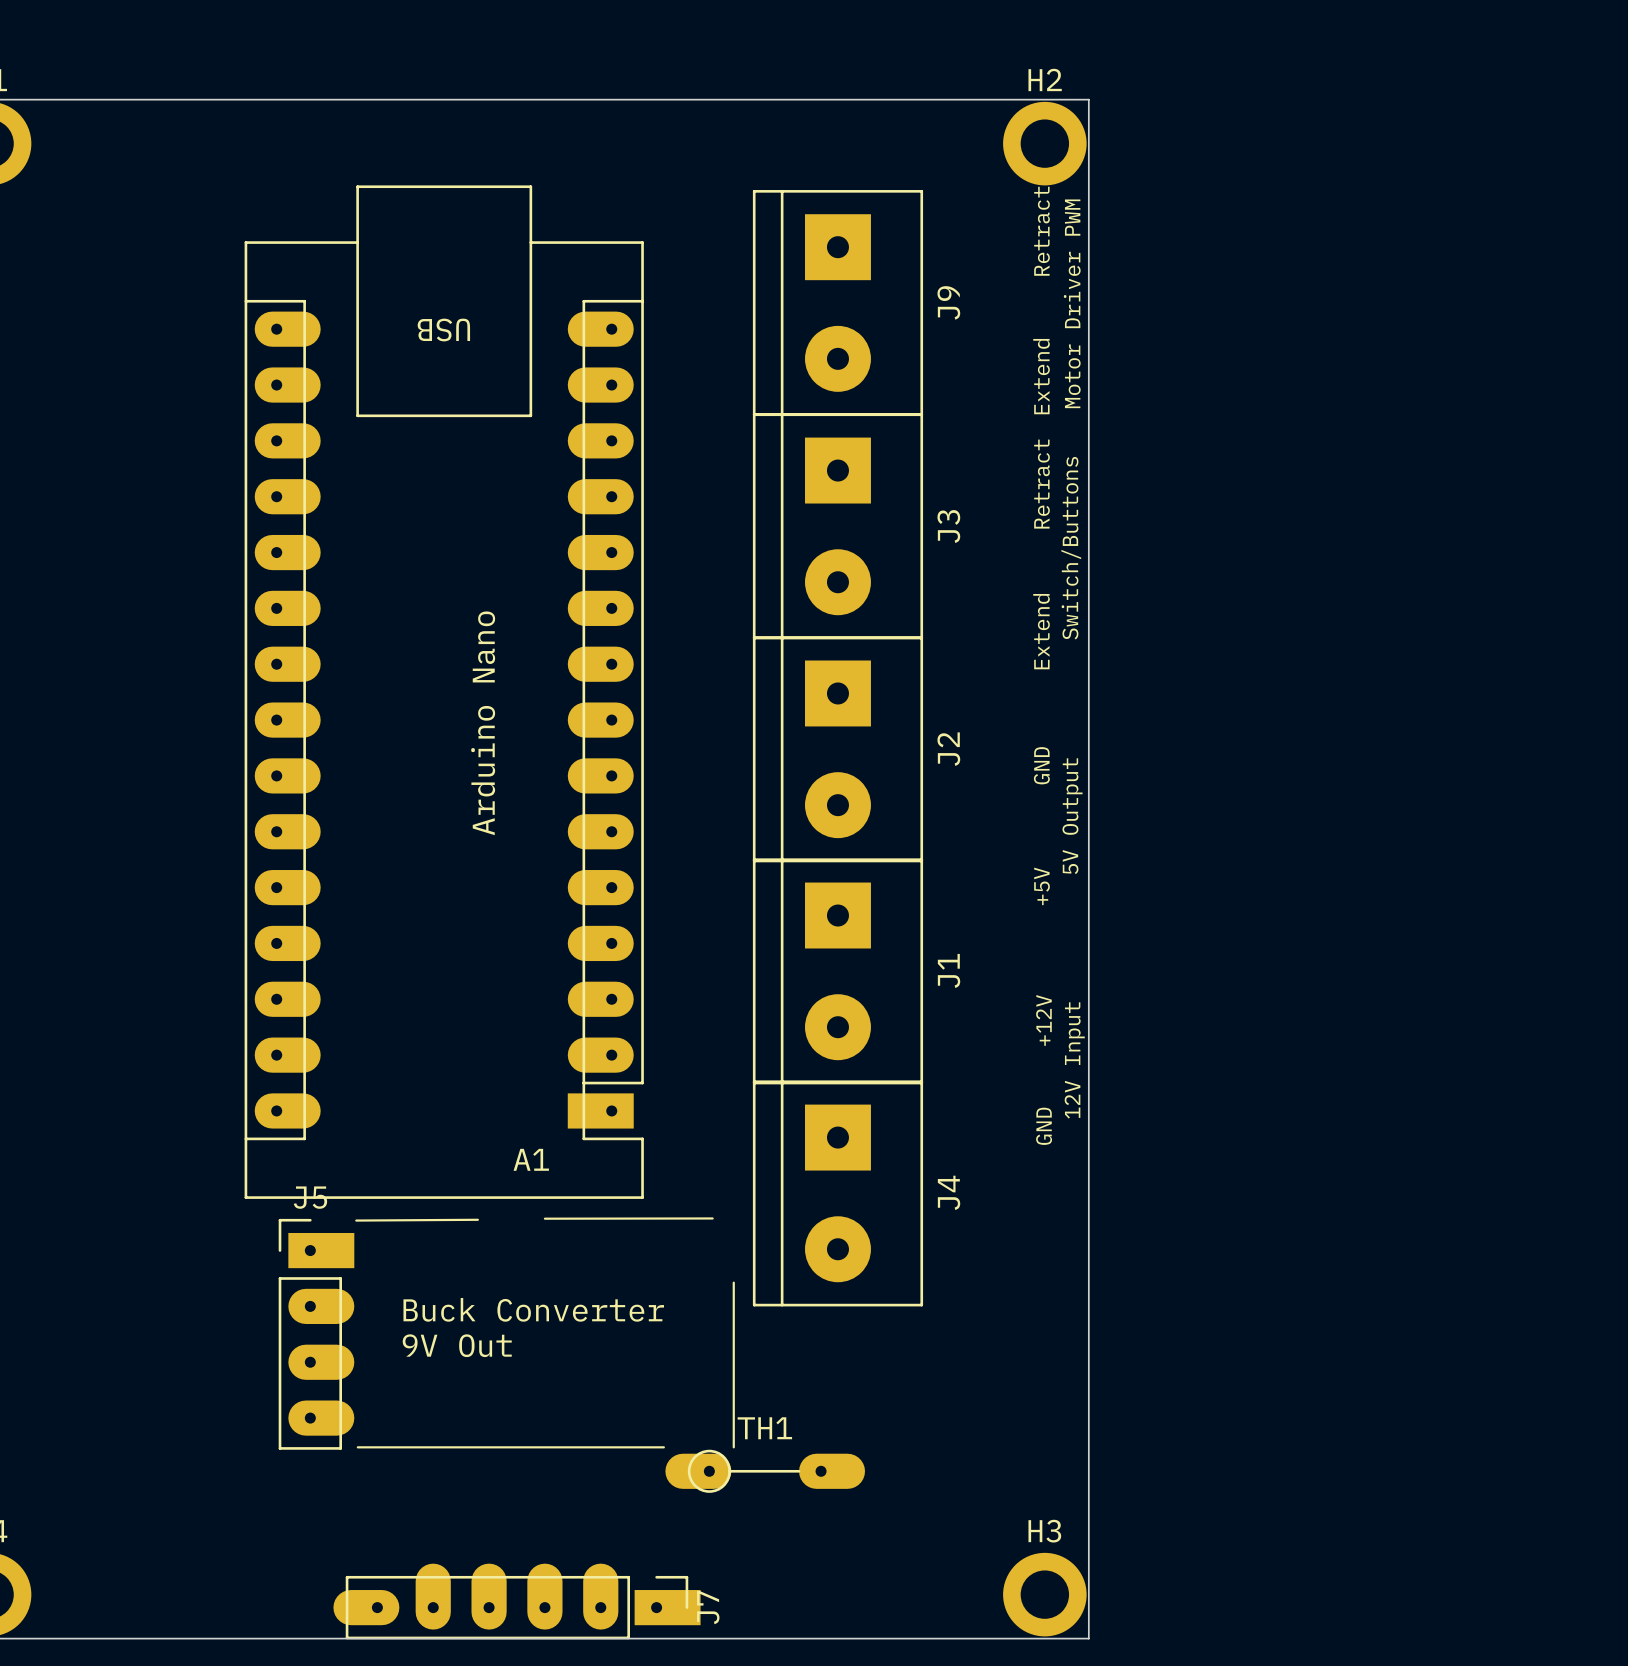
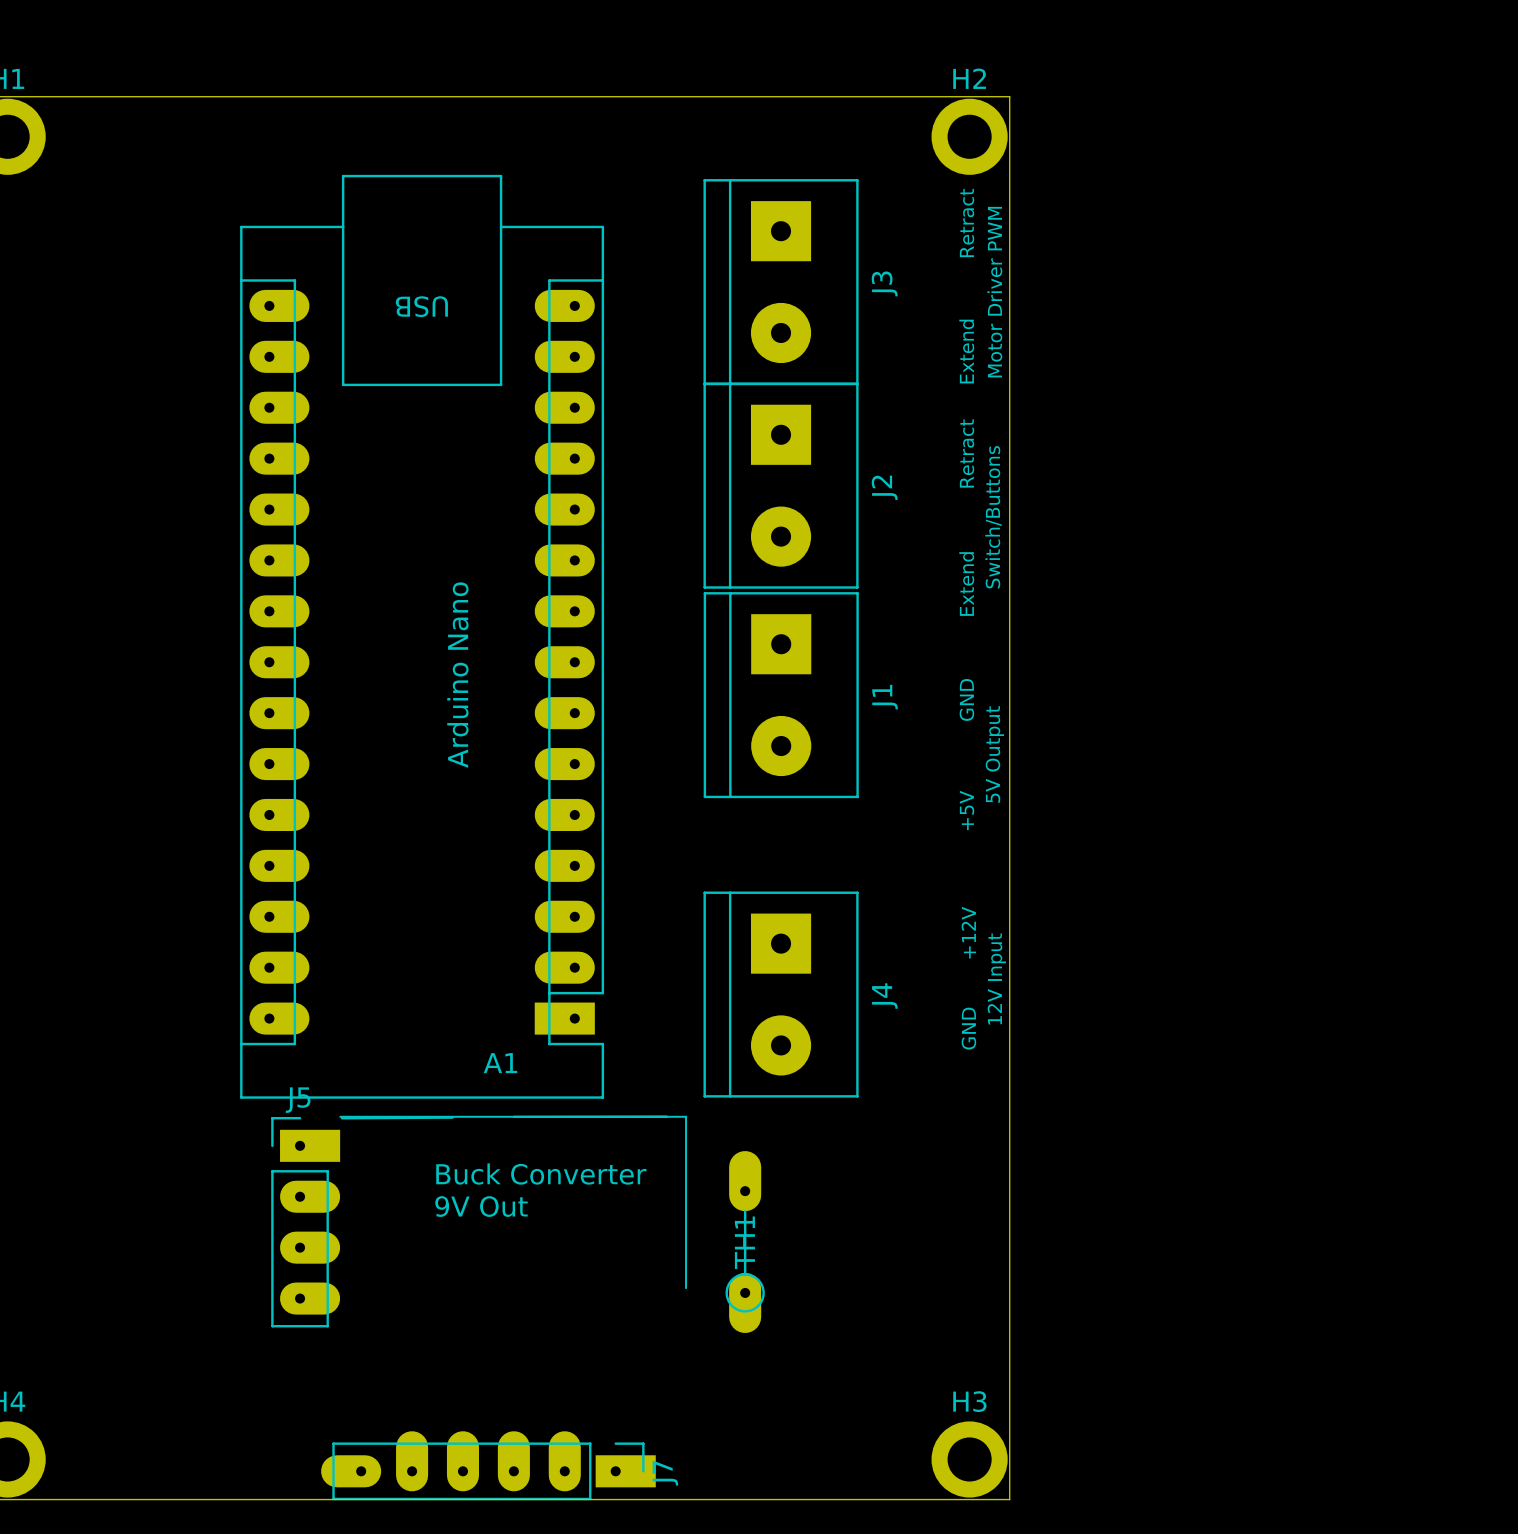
J9 name: J9 (948, 302) -> J3 (884, 283)
J3 name: J3 (948, 526) -> J2 (884, 487)
J2: (837, 749) -> none
J1 position: (837, 971) -> (781, 695)
J4 position: (837, 1193) -> (781, 994)
line: none -> (340, 1116) (686, 1116) (686, 1175)
text position: Buck Converter (533, 1309) -> Buck Converter (541, 1174)
text position: 9V Out (457, 1345) -> 9V Out (481, 1206)
line: (733, 1406) (733, 1447) -> none
line: (357, 1447) (663, 1447) -> none
TH1 rotation: 0° (765, 1471) -> 90° counterclockwise (745, 1242)
TH1 position: (765, 1471) -> (745, 1242)

